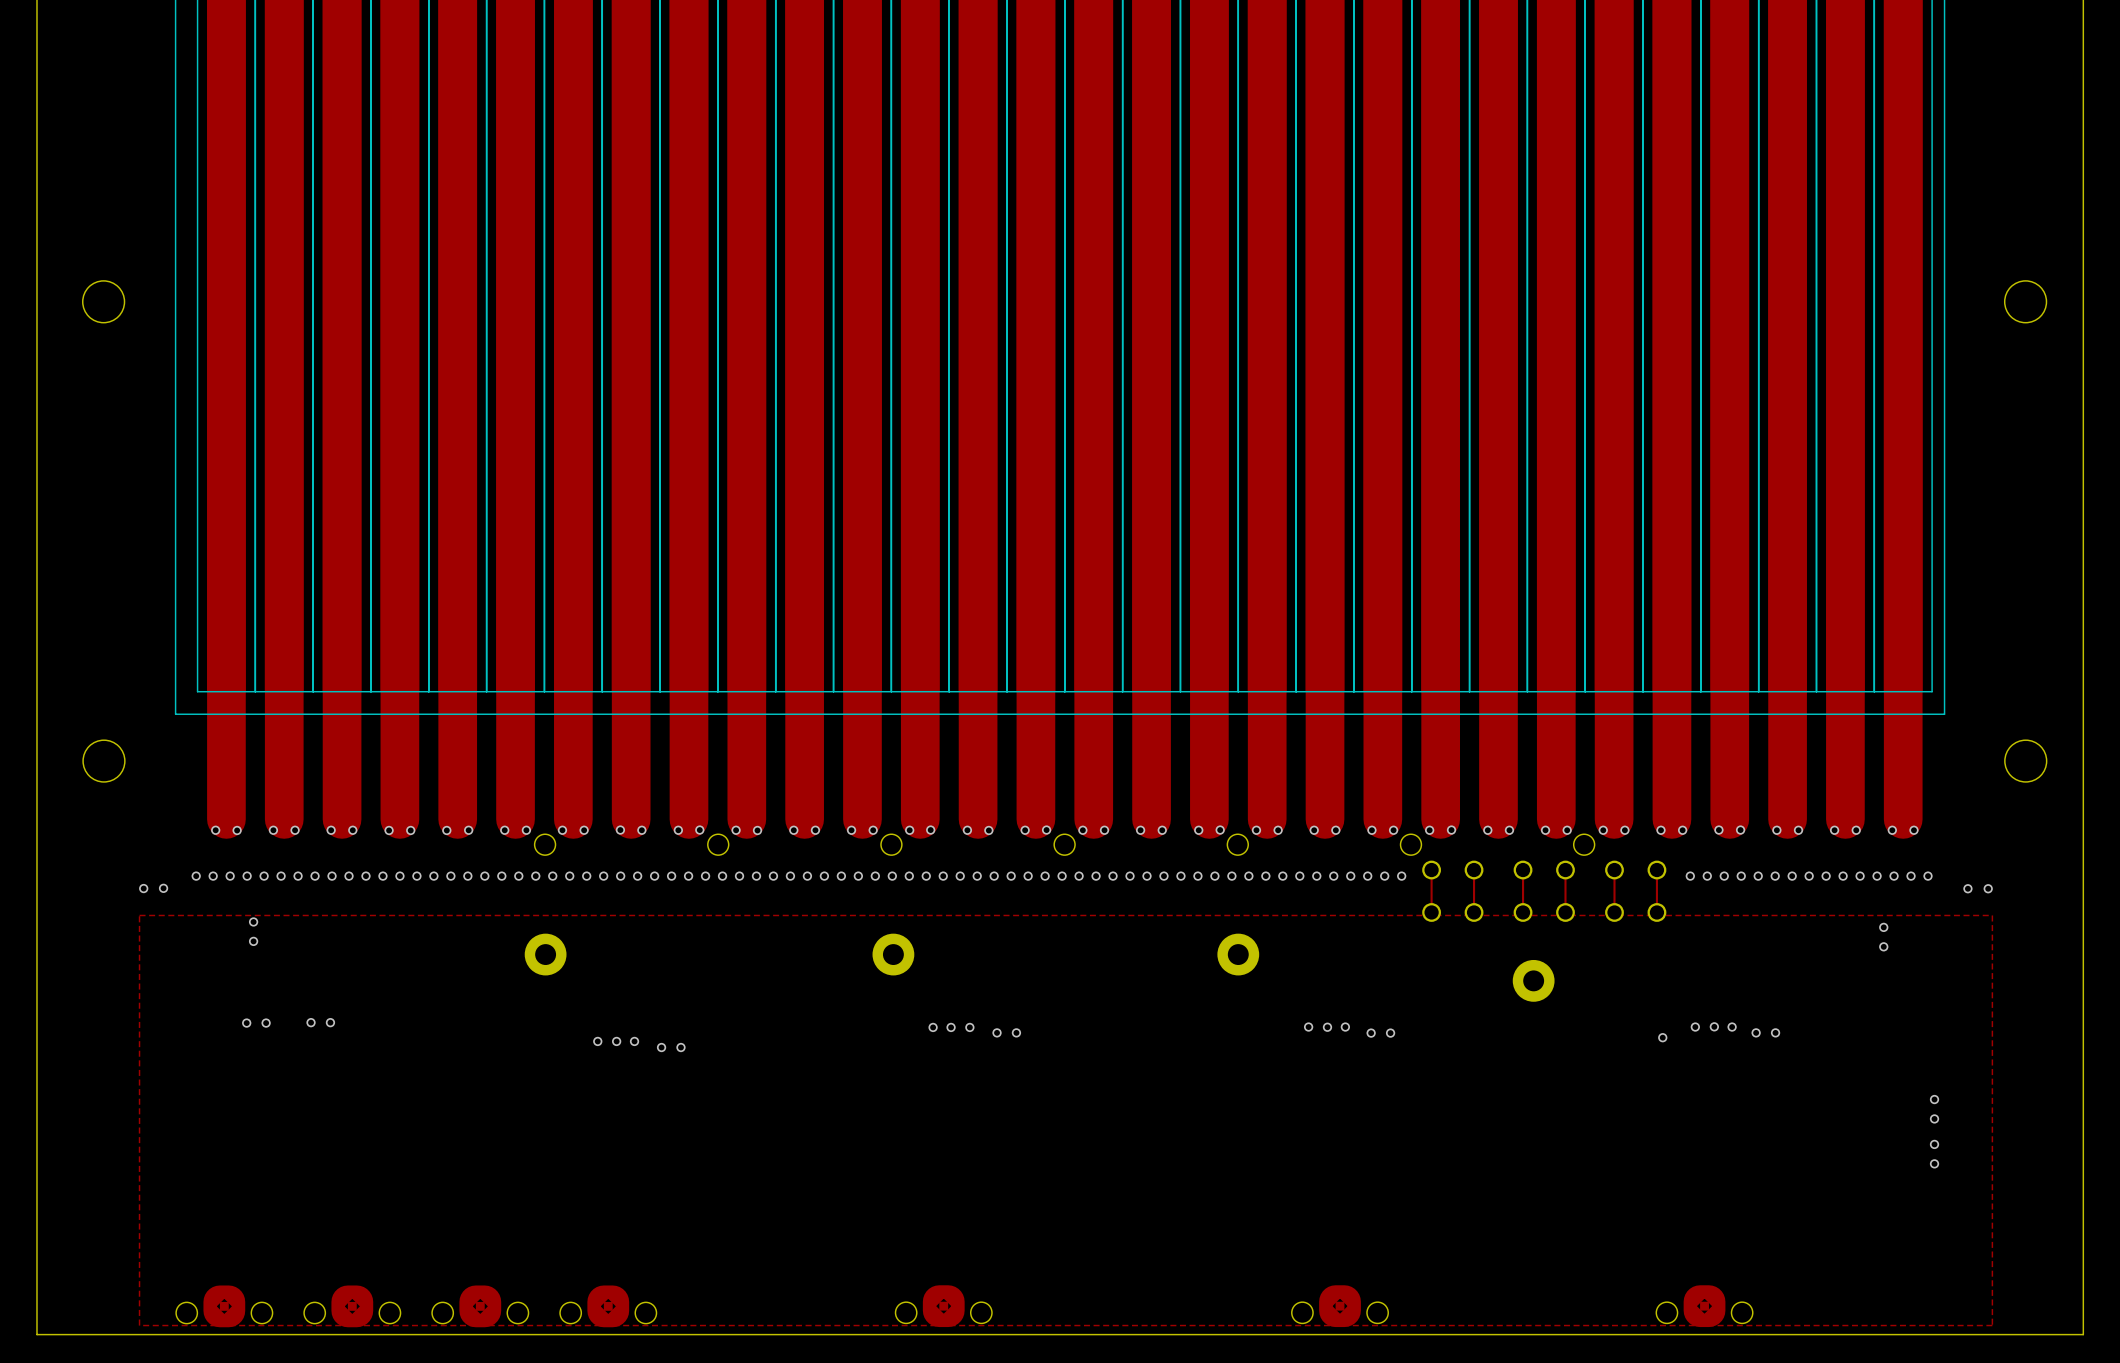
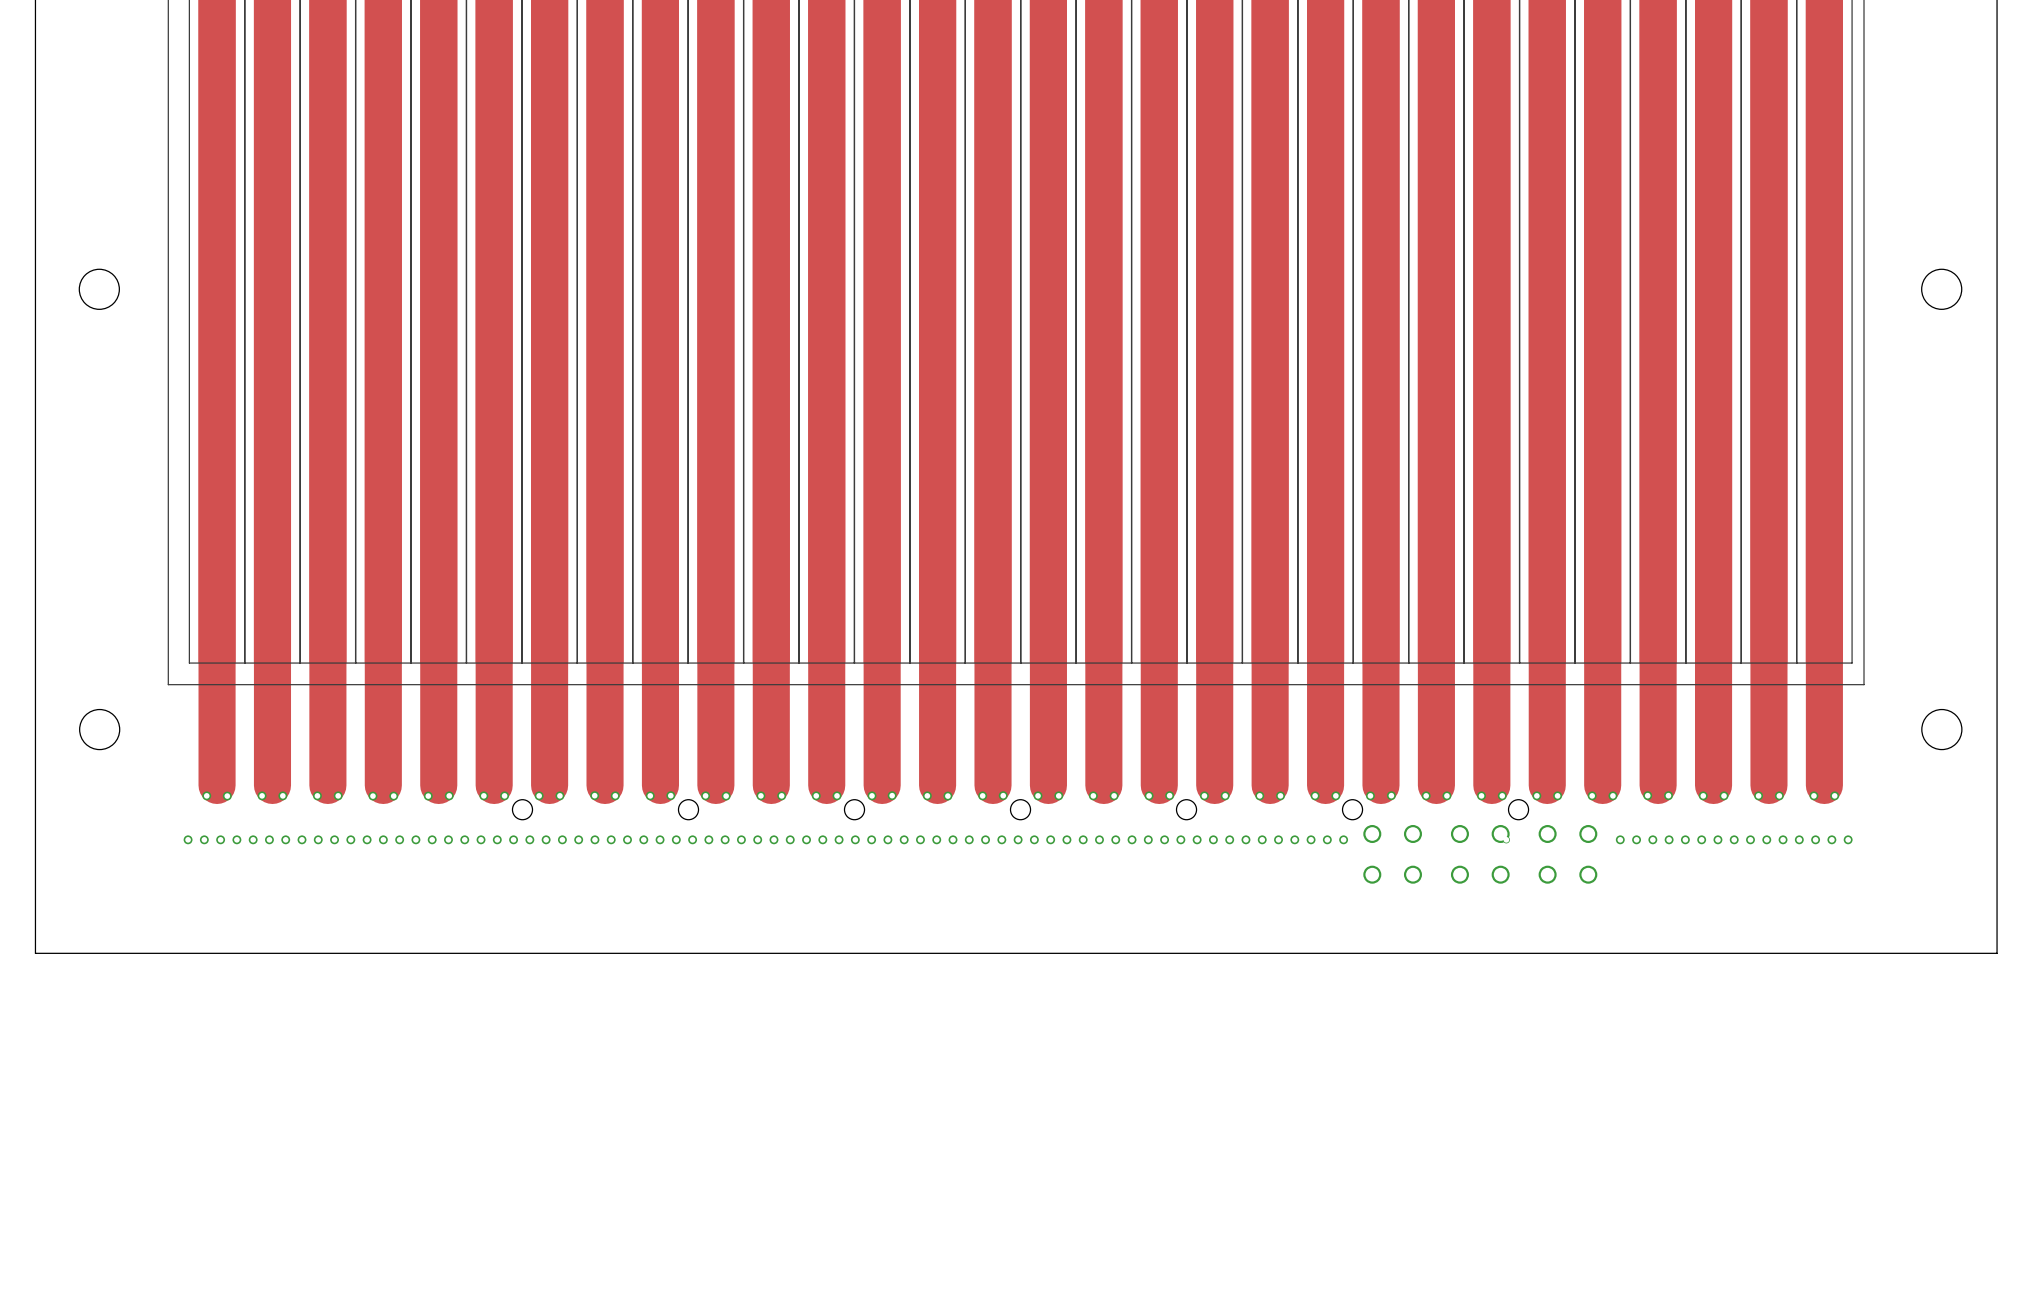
track: (1431, 870) (1431, 912) -> none
track: (1474, 870) (1474, 912) -> none
track: (1523, 870) (1523, 912) -> none
track: (1565, 870) (1565, 912) -> none
track: (1614, 870) (1614, 912) -> none
track: (1656, 870) (1656, 912) -> none
via: none -> (1506, 839)
via: (143, 888) -> none
via: (163, 888) -> none
via: (1967, 888) -> none
via: (1988, 888) -> none
zone outline: (139, 915) (139, 1325) (1992, 1325) (1992, 915) (139, 915) -> none
via: (253, 921) -> none
via: (1883, 927) -> none
via: (253, 941) -> none
via: (1883, 946) -> none
part: (545, 954) -> none
part: (893, 954) -> none
part: (1238, 954) -> none
part: (1533, 980) -> none
board edge: (36, 994) (36, 1334) (2083, 1334) (2083, 994) -> (35, 953) (1997, 953)
via: (311, 1022) -> none
via: (330, 1022) -> none
via: (246, 1023) -> none
via: (266, 1023) -> none
via: (1714, 1026) -> none
via: (933, 1027) -> none
via: (951, 1027) -> none
via: (969, 1027) -> none
via: (1308, 1027) -> none
via: (1327, 1027) -> none
via: (1345, 1027) -> none
via: (1695, 1027) -> none
via: (1732, 1027) -> none
via: (997, 1032) -> none
via: (1016, 1032) -> none
via: (1756, 1032) -> none
via: (1775, 1032) -> none
via: (1371, 1033) -> none
via: (1390, 1033) -> none
via: (1662, 1037) -> none
via: (597, 1041) -> none
via: (616, 1041) -> none
via: (634, 1041) -> none
via: (661, 1047) -> none
via: (680, 1047) -> none
via: (1934, 1099) -> none
via: (1934, 1118) -> none
via: (1934, 1144) -> none
via: (1934, 1163) -> none
part: (224, 1306) -> none
part: (352, 1306) -> none
part: (480, 1306) -> none
part: (608, 1306) -> none
part: (943, 1306) -> none
part: (1340, 1306) -> none
part: (1704, 1306) -> none

